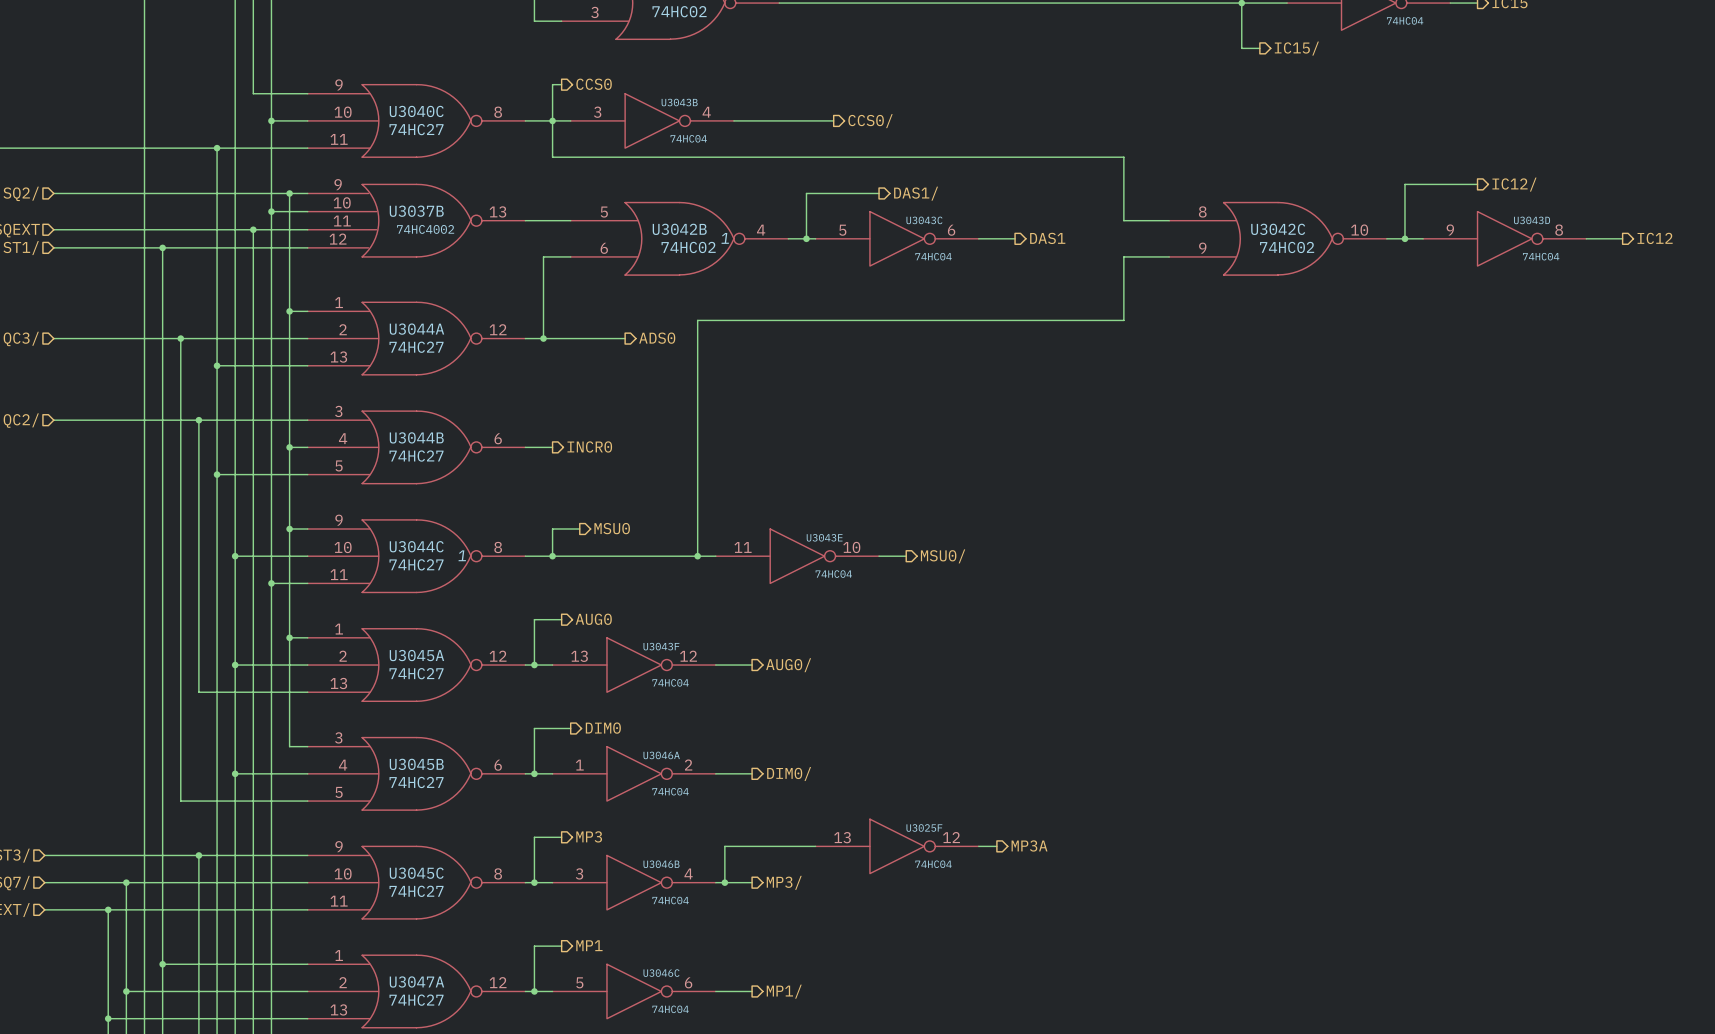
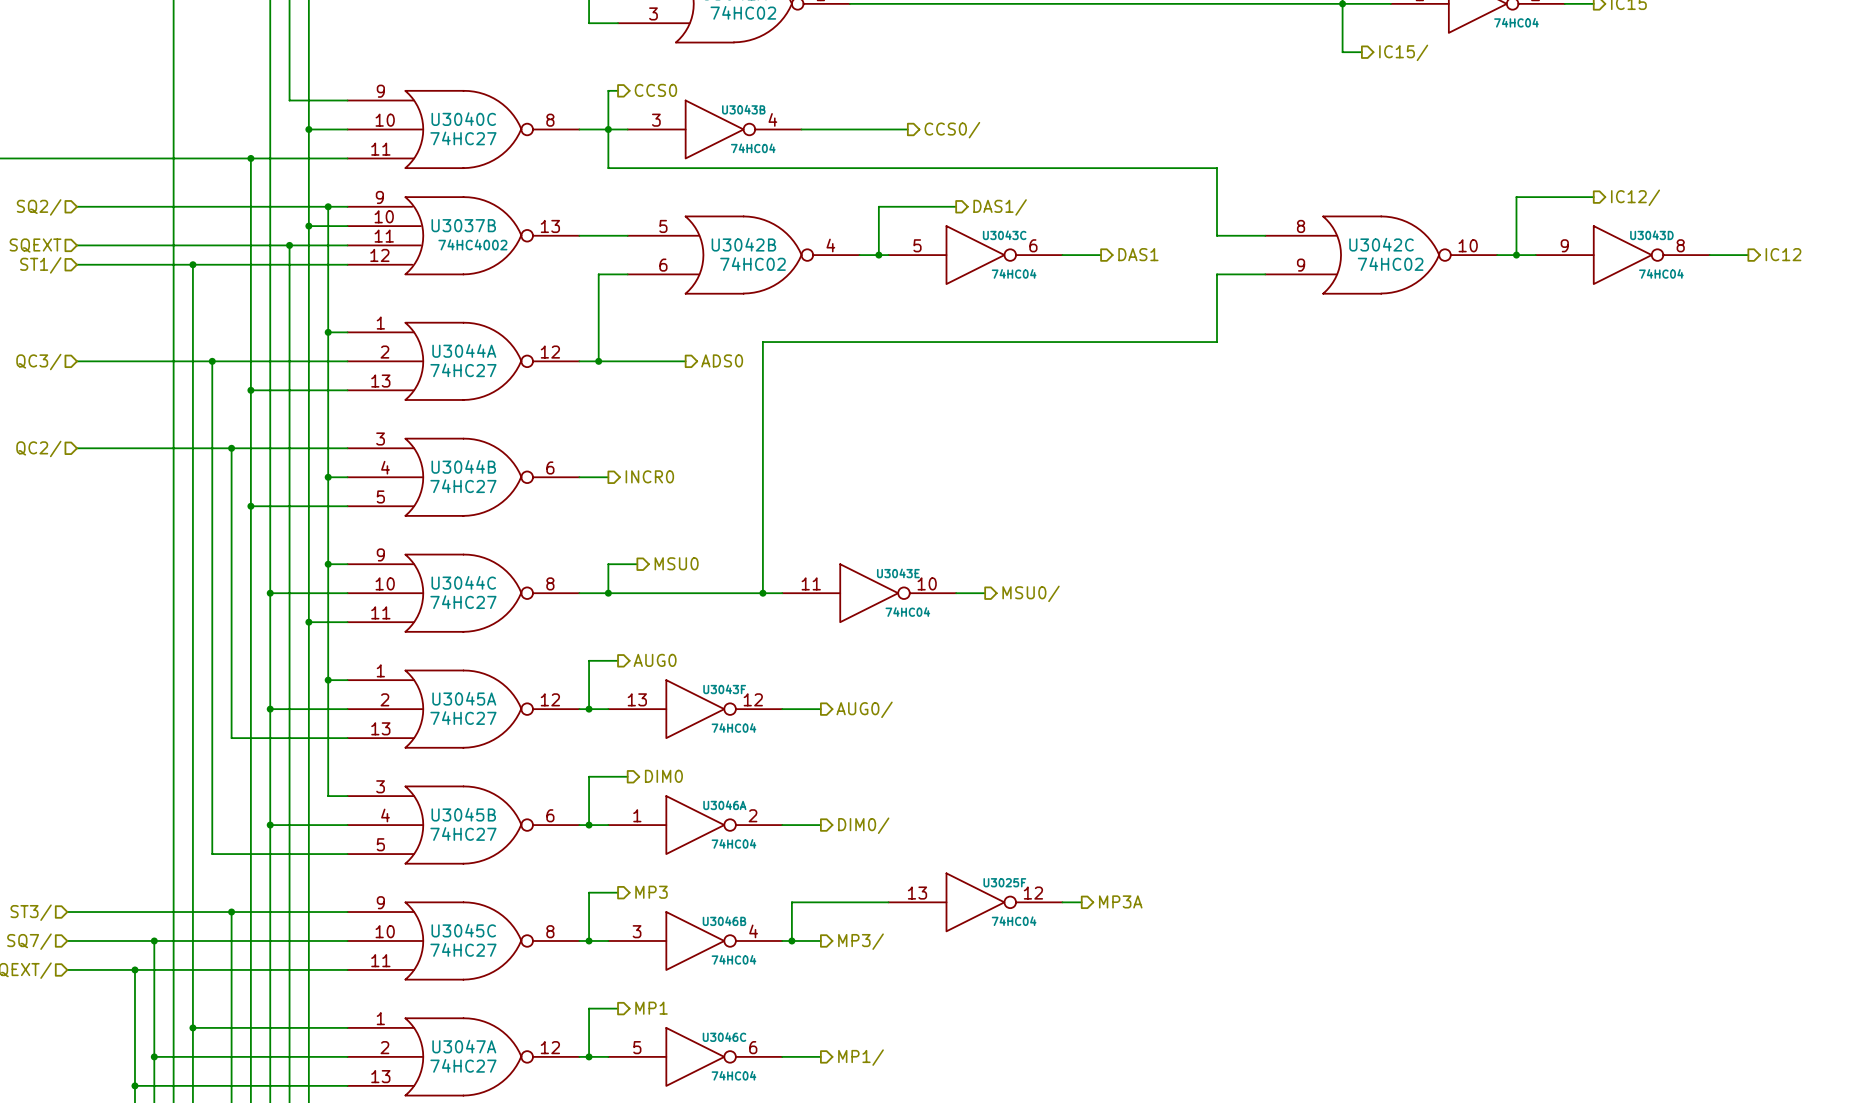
U3042B text: 1 (725, 238) -> none
U3044C text: 1 (462, 555) -> none

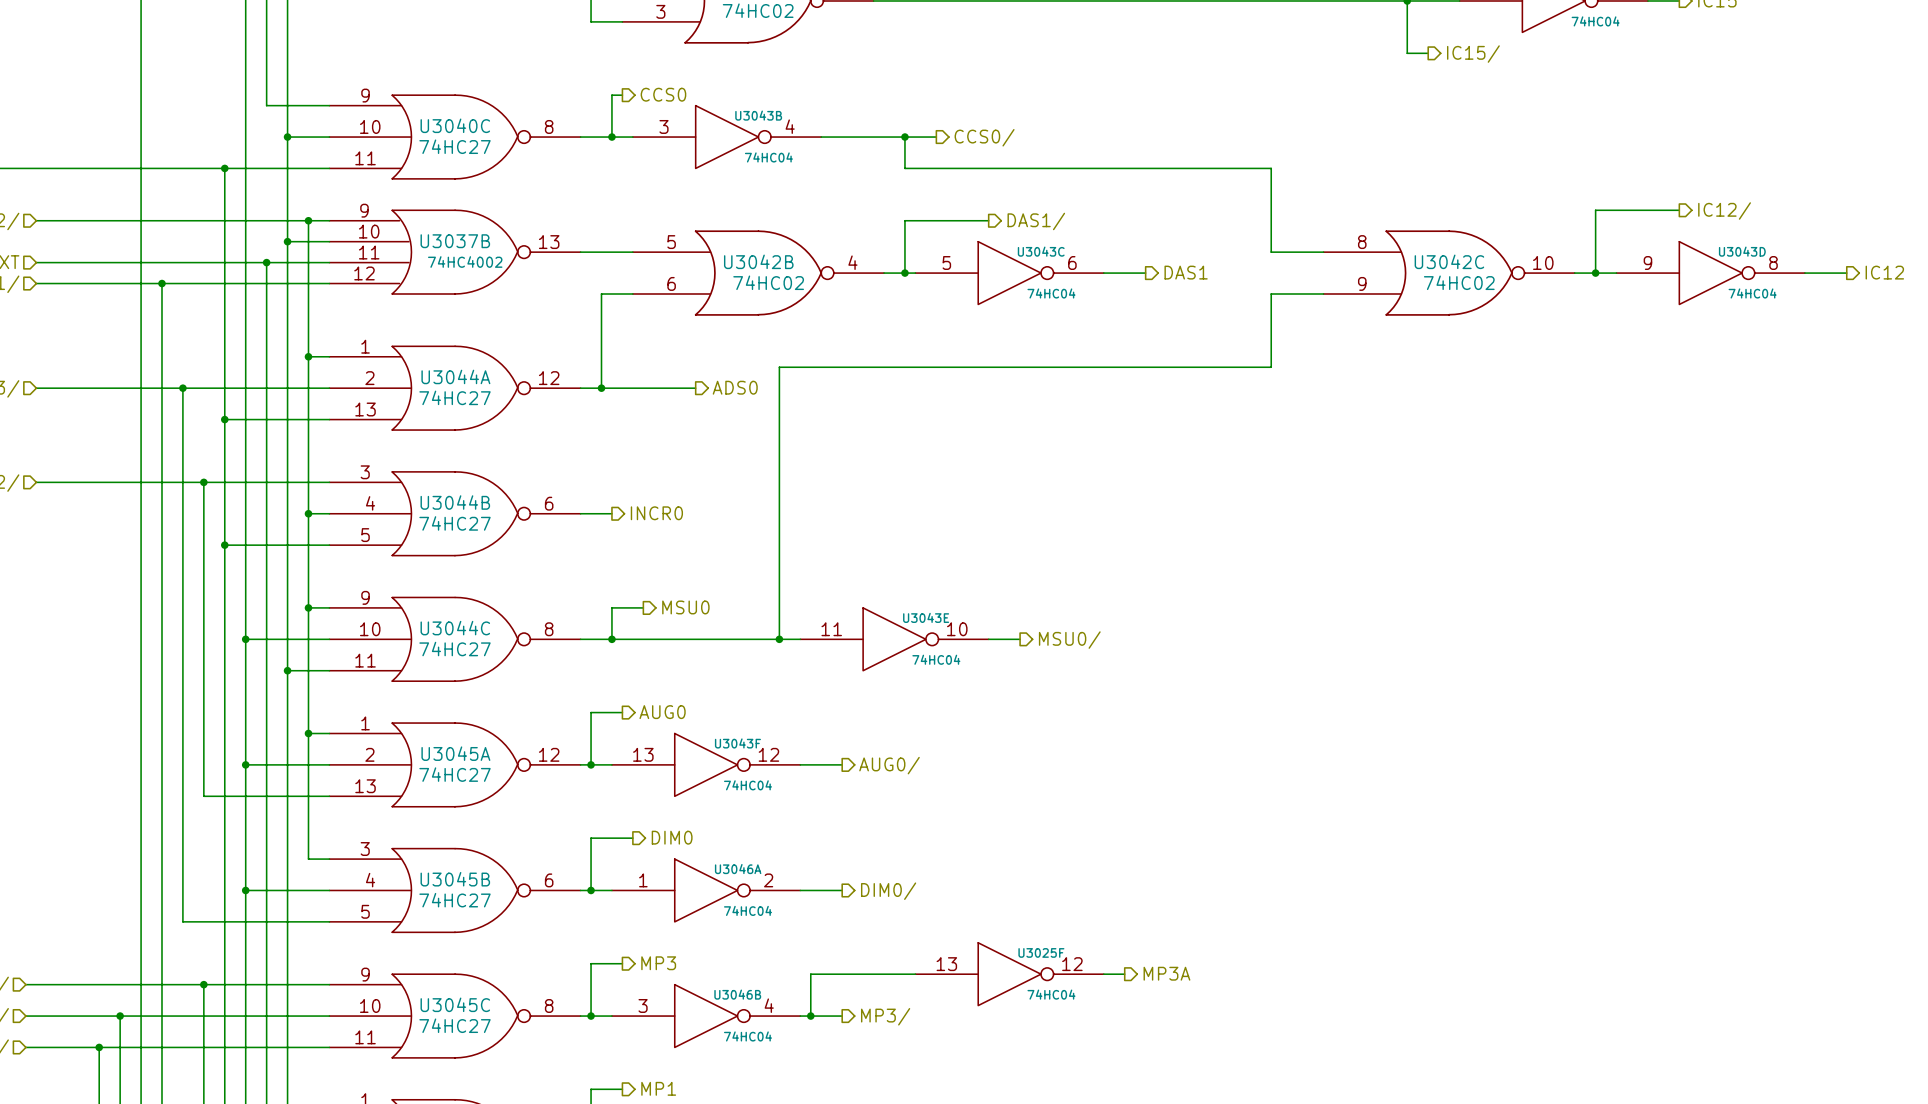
wire: (608, 129) (608, 168) (1216, 168) -> (904, 137) (904, 168) (1271, 168) (1271, 178)
junction: none -> (904, 137)

